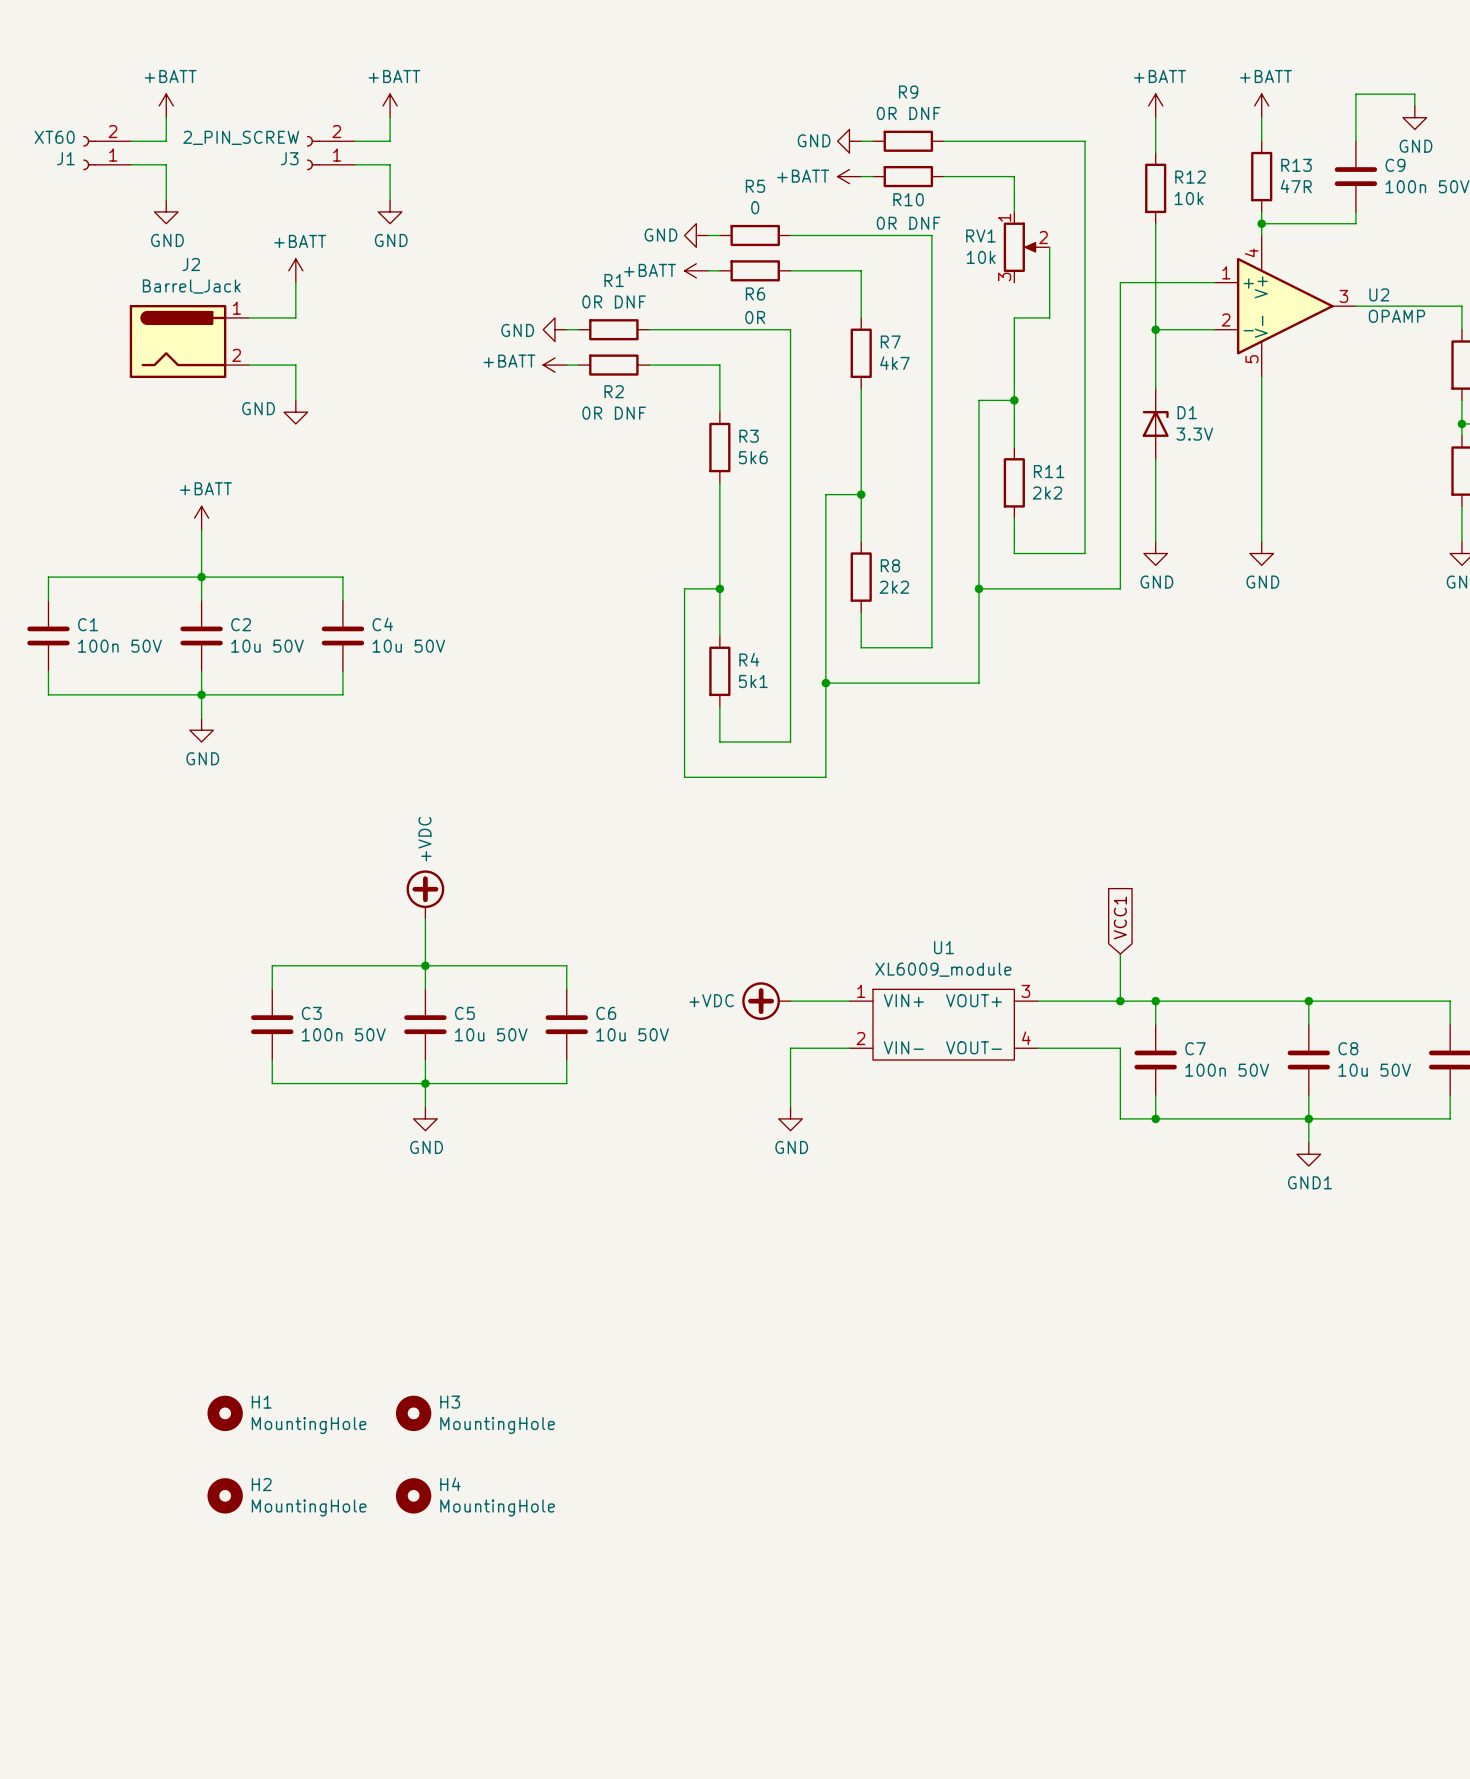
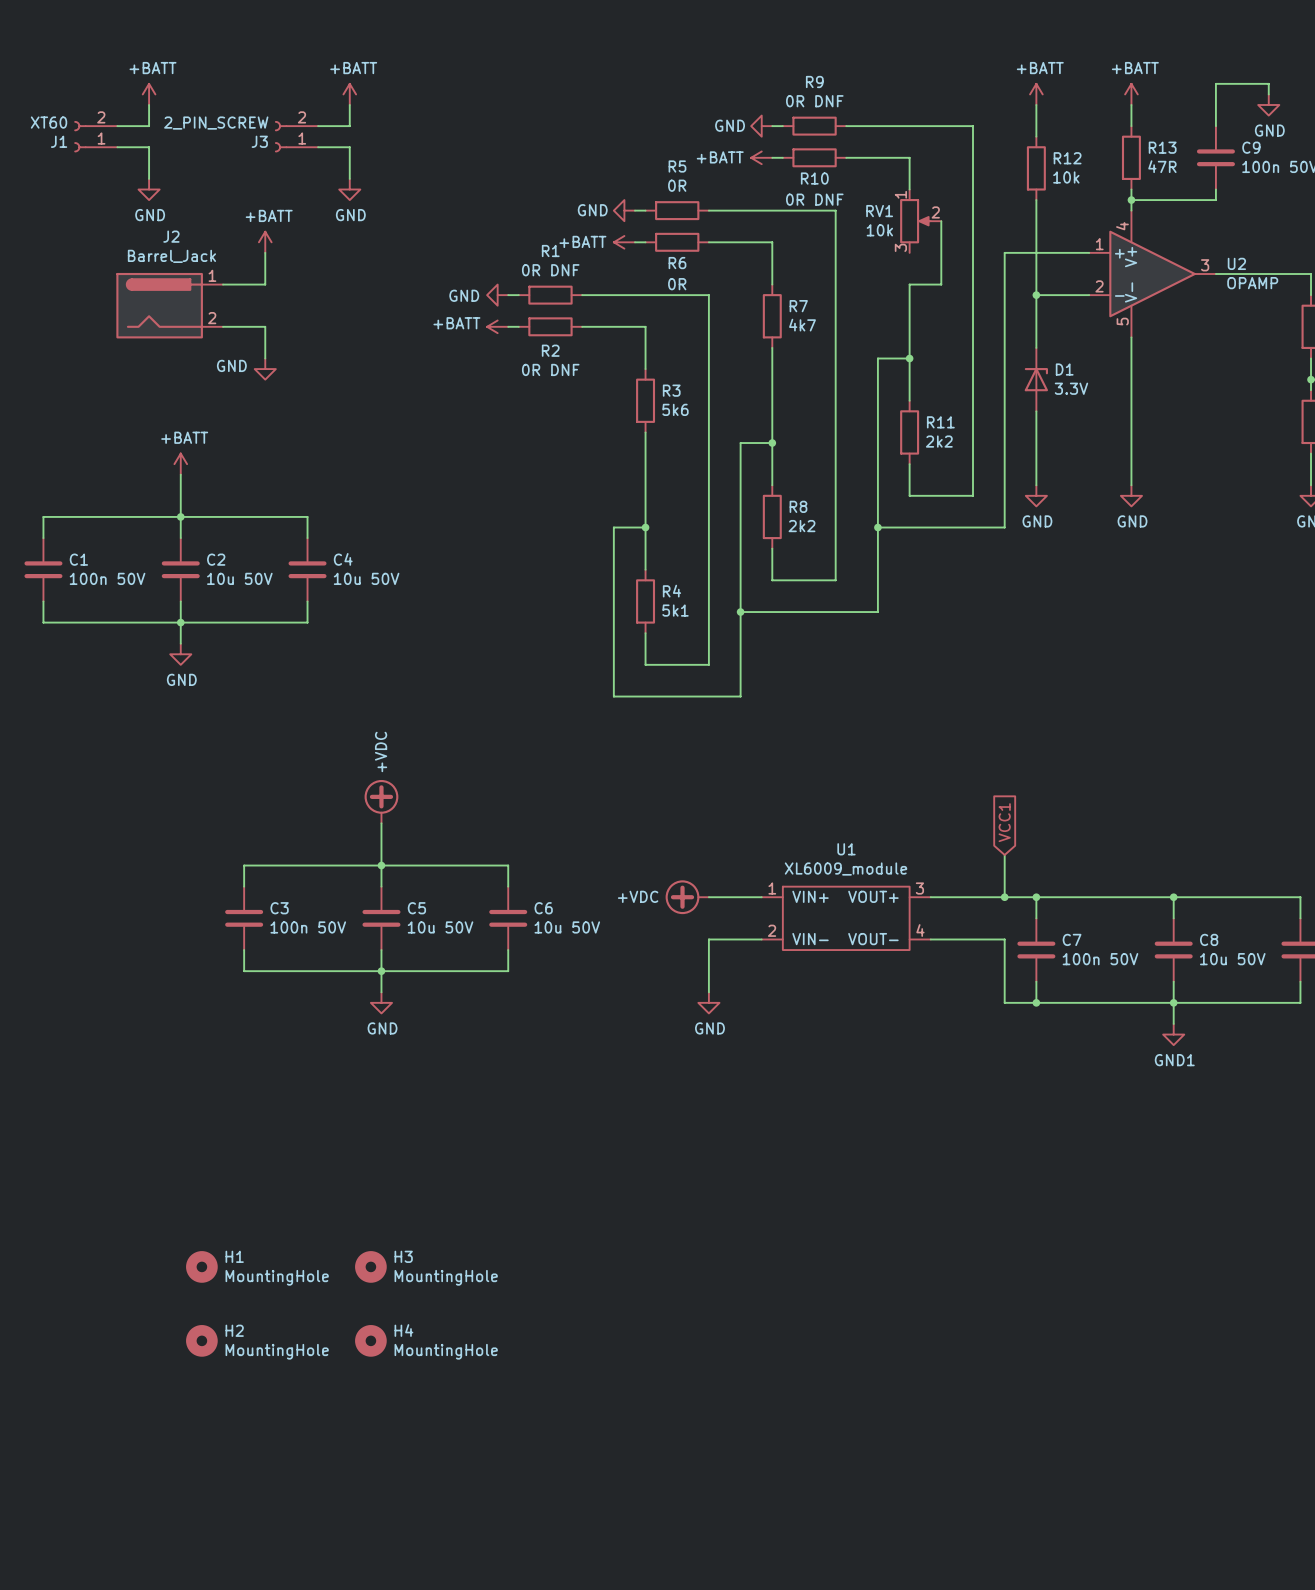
R5 value: 0 (755, 207) -> 0R (677, 185)

